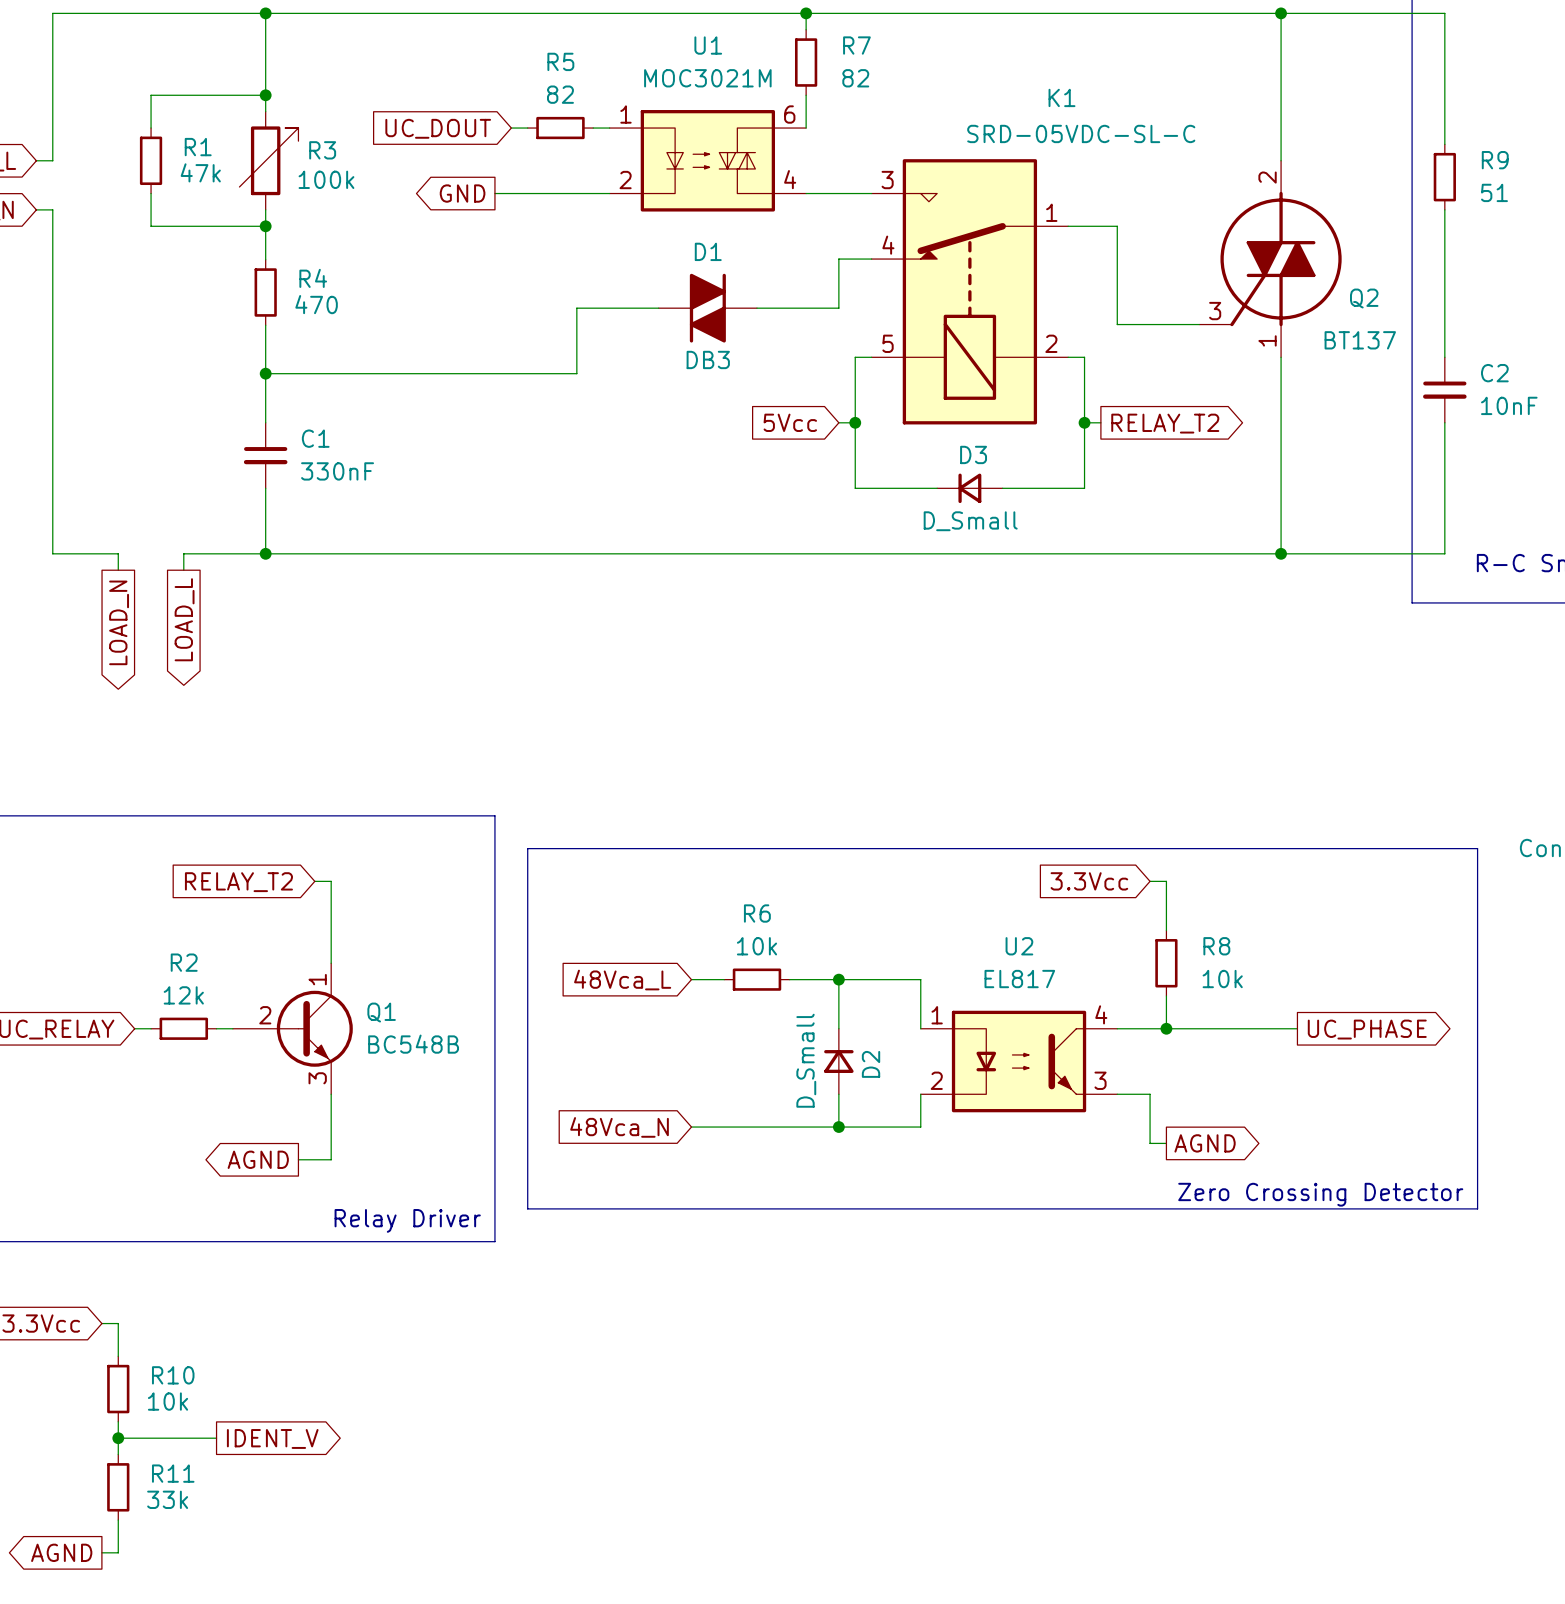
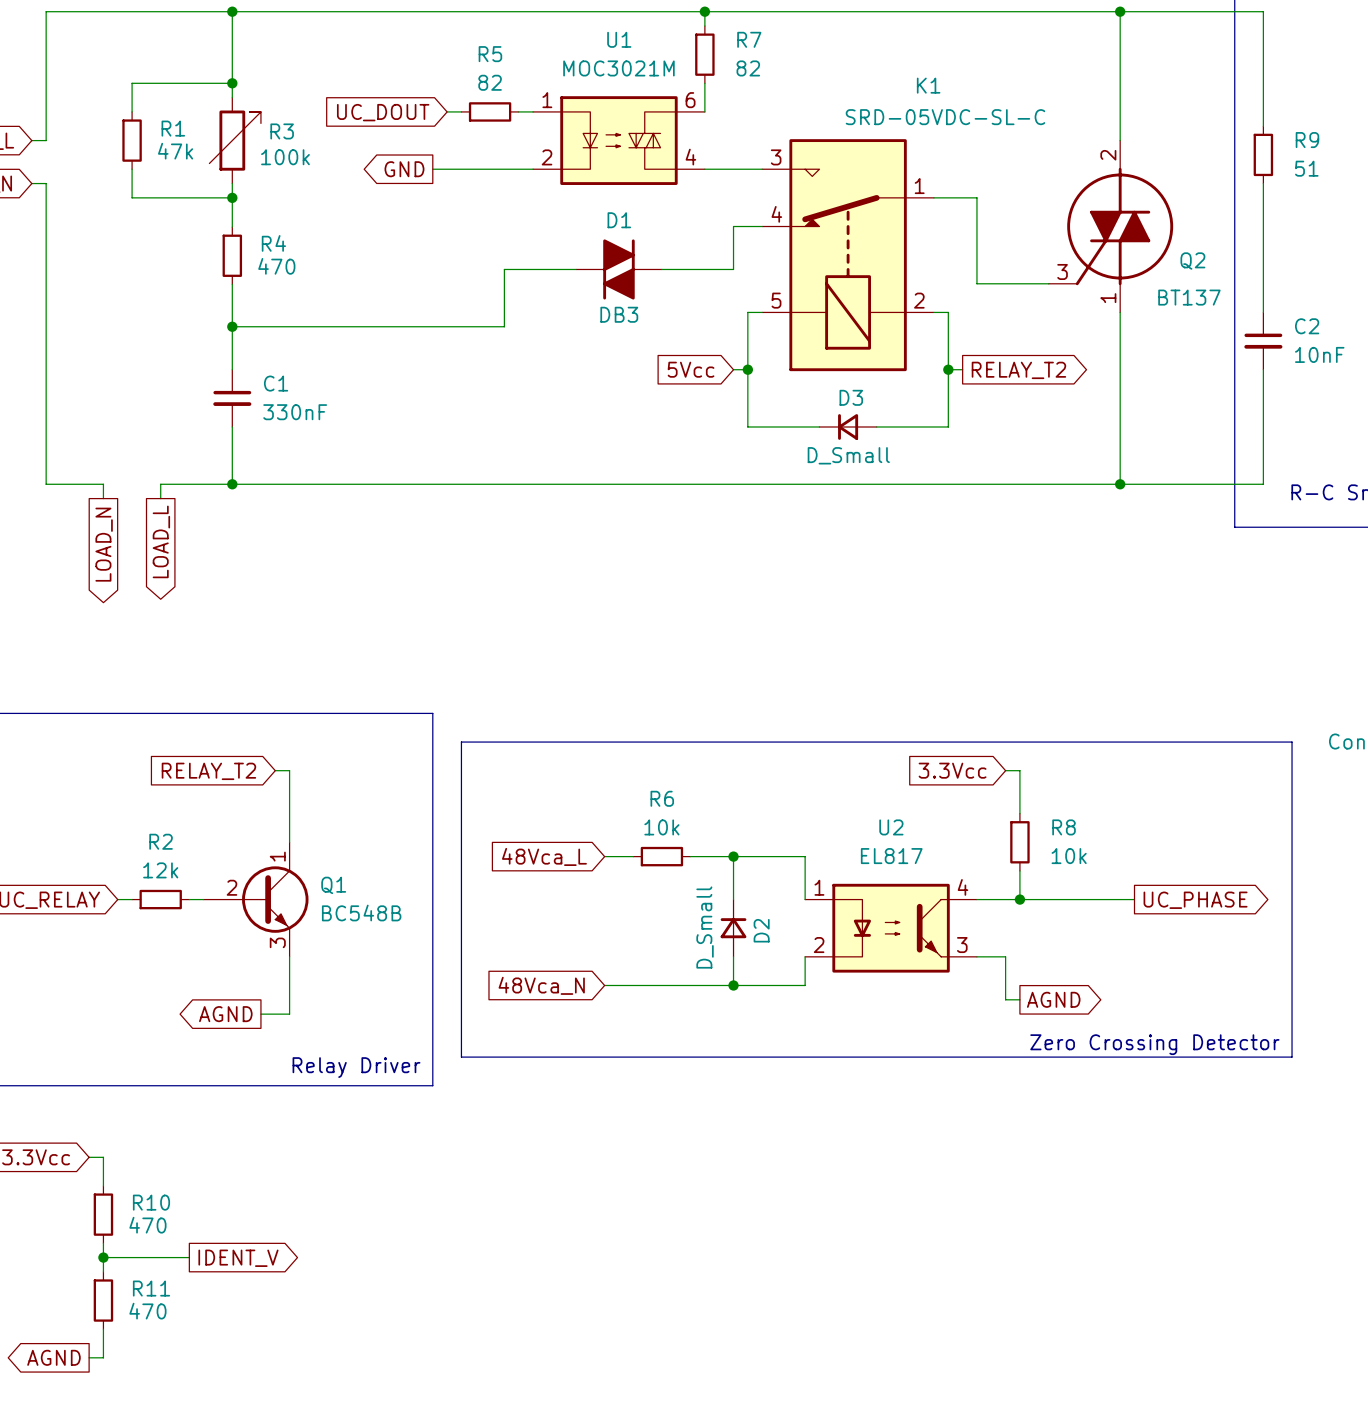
R10 value: 10k (168, 1401) -> 470 (147, 1225)
R11 value: 33k (167, 1499) -> 470 (147, 1311)

